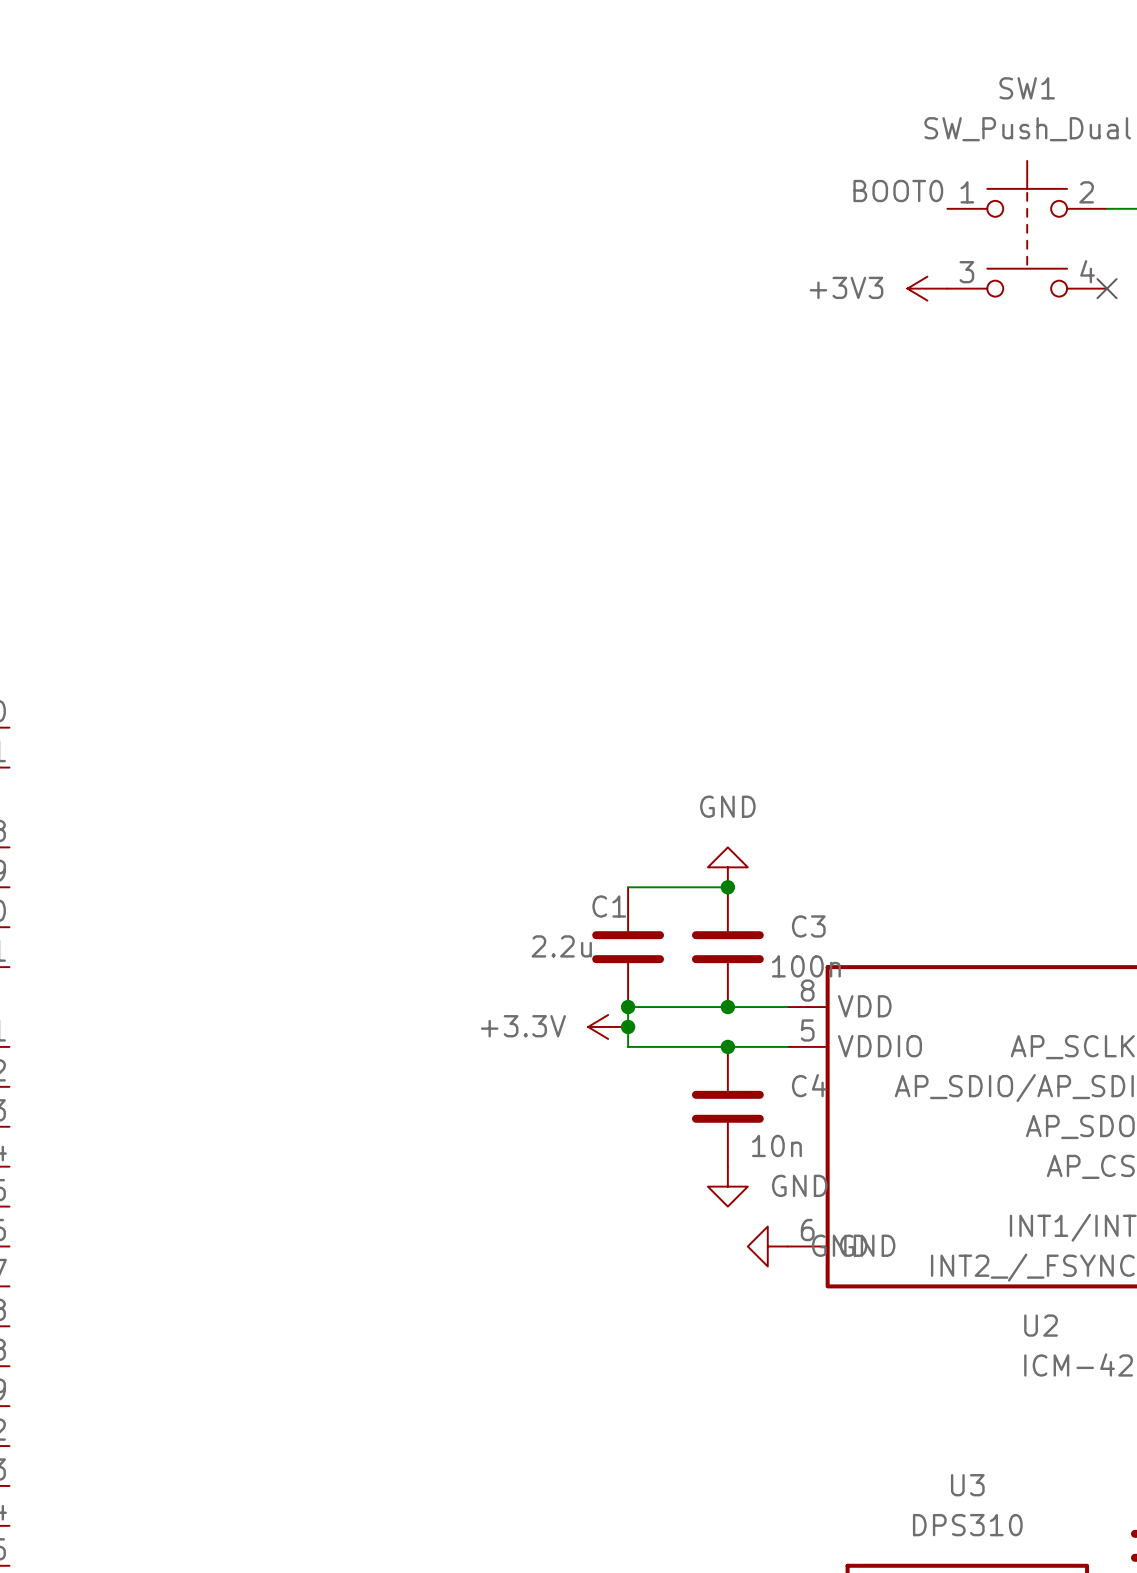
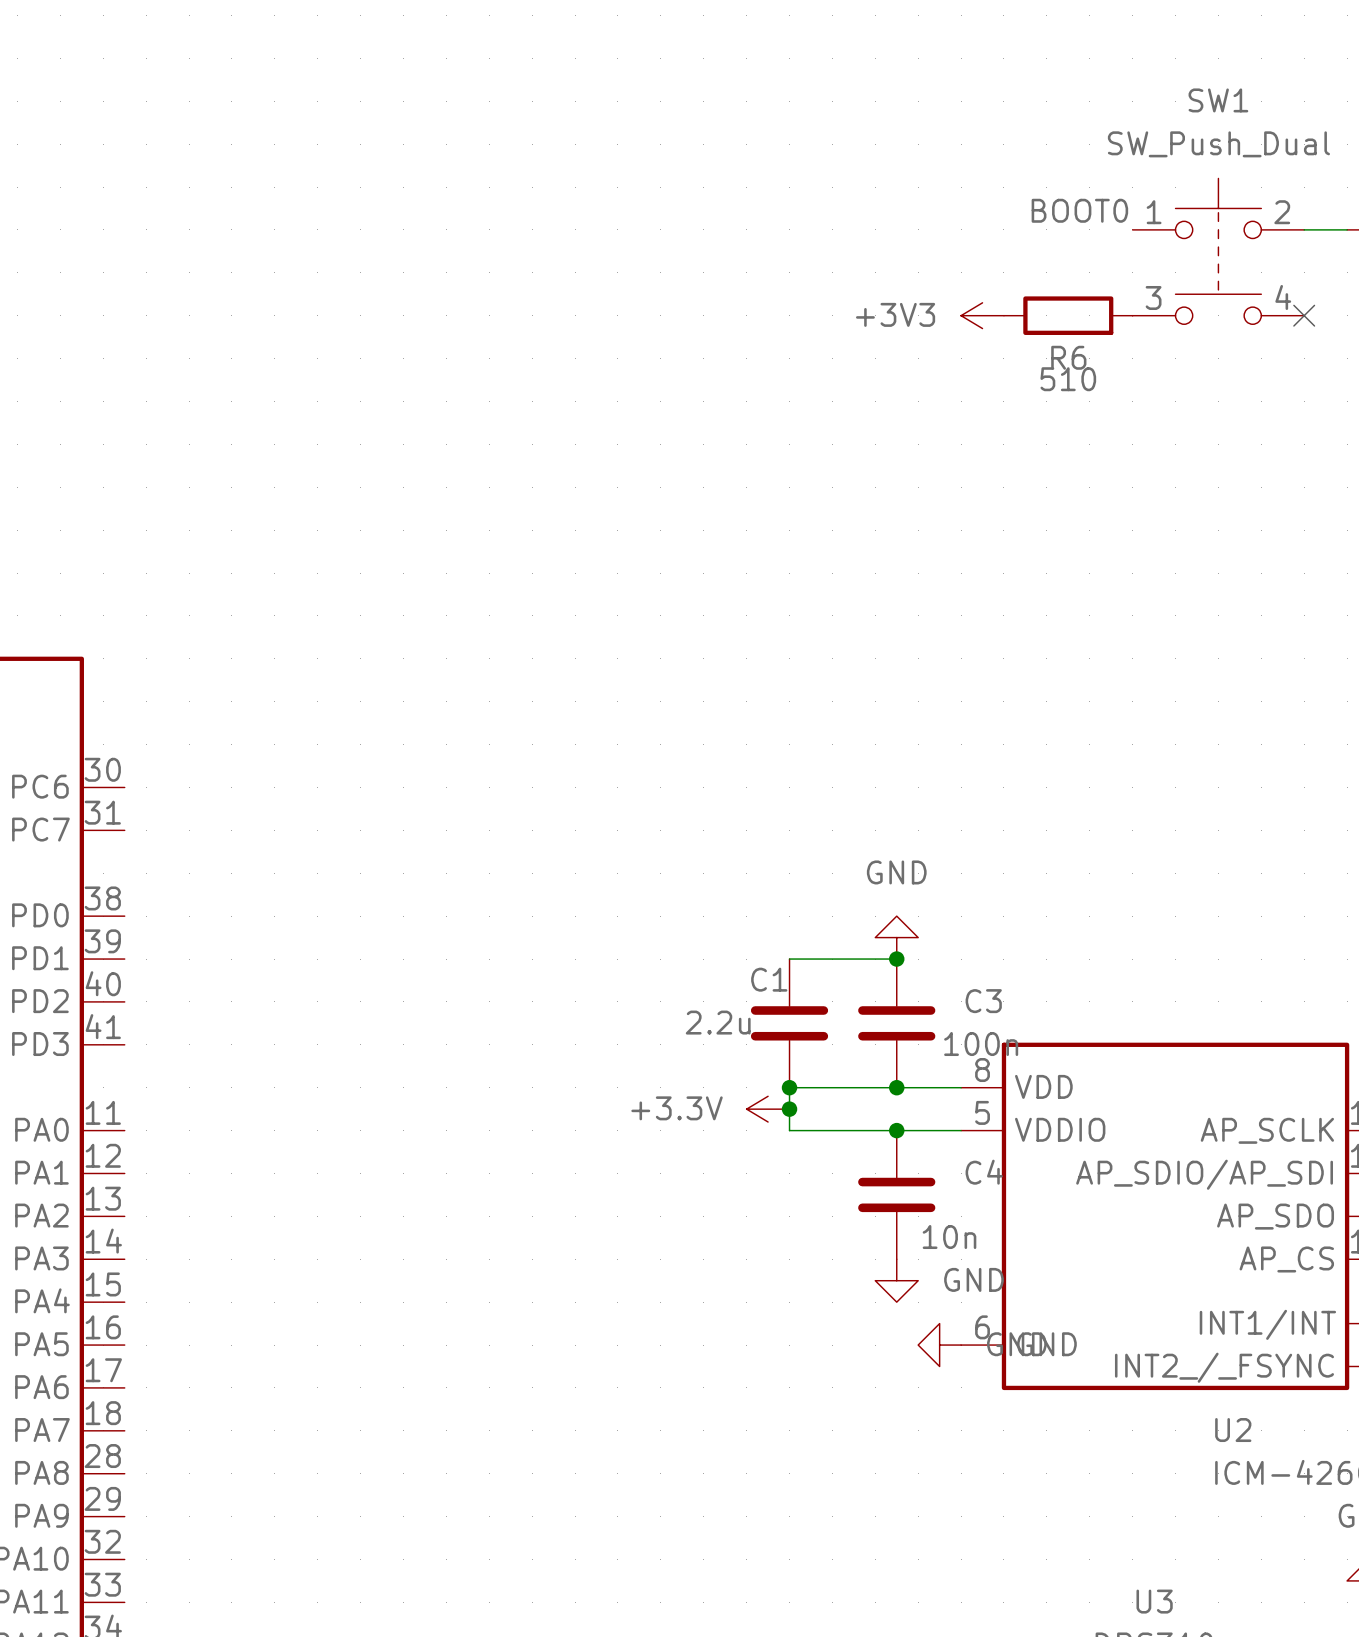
R6: none -> 510 (1068, 315)
power symbol position: +3V3 (927, 288) -> +3V3 (982, 315)

